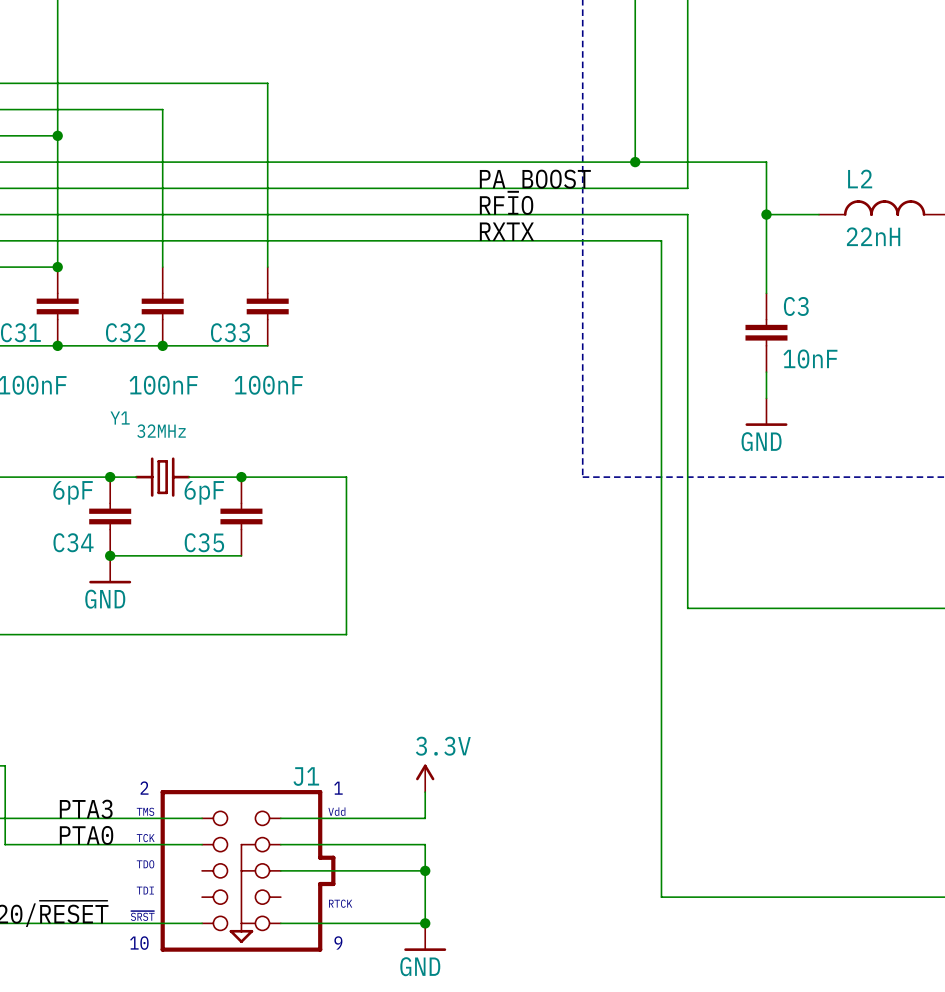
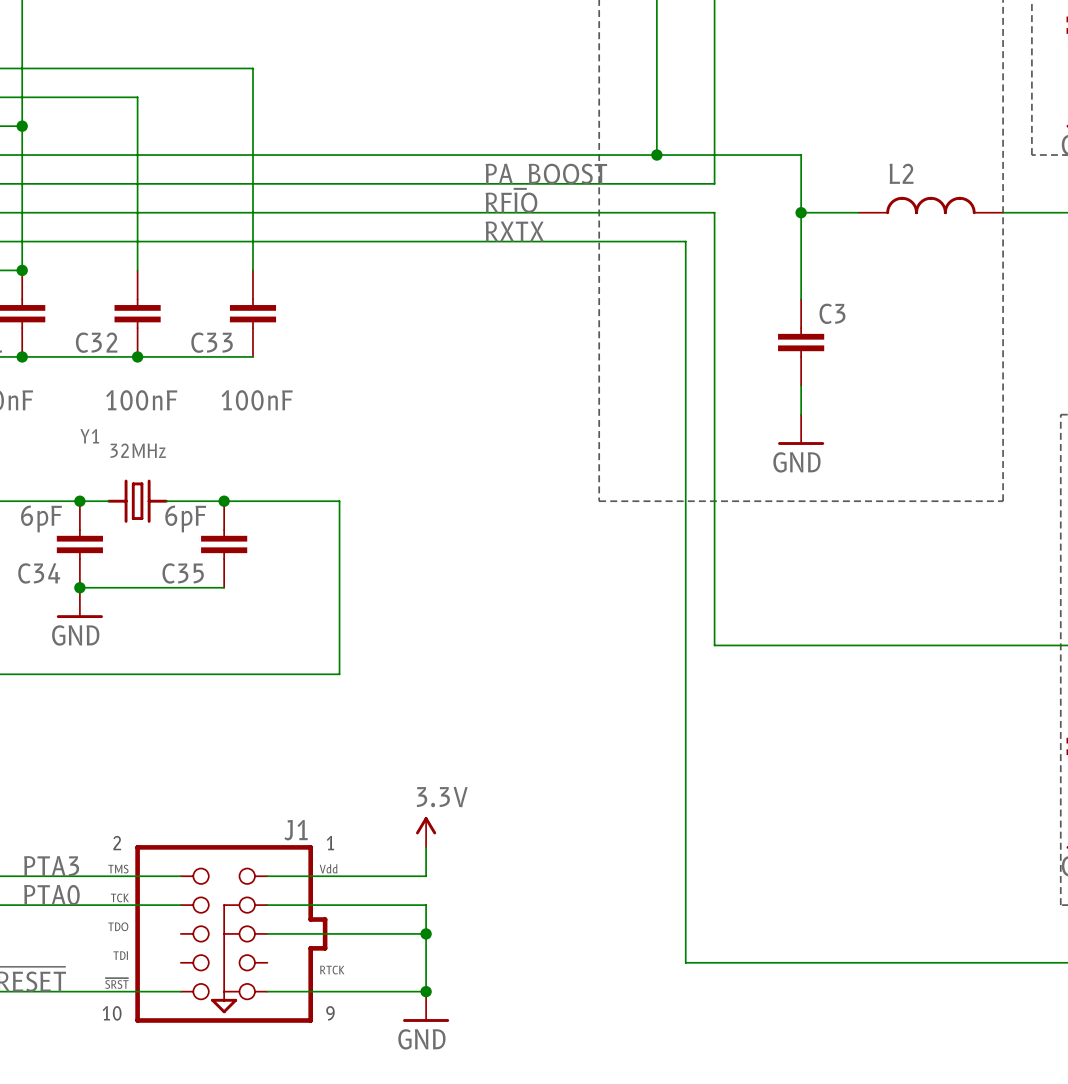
L2 value: 22nH (873, 236) -> none
C3 value: 10nF (810, 358) -> none

